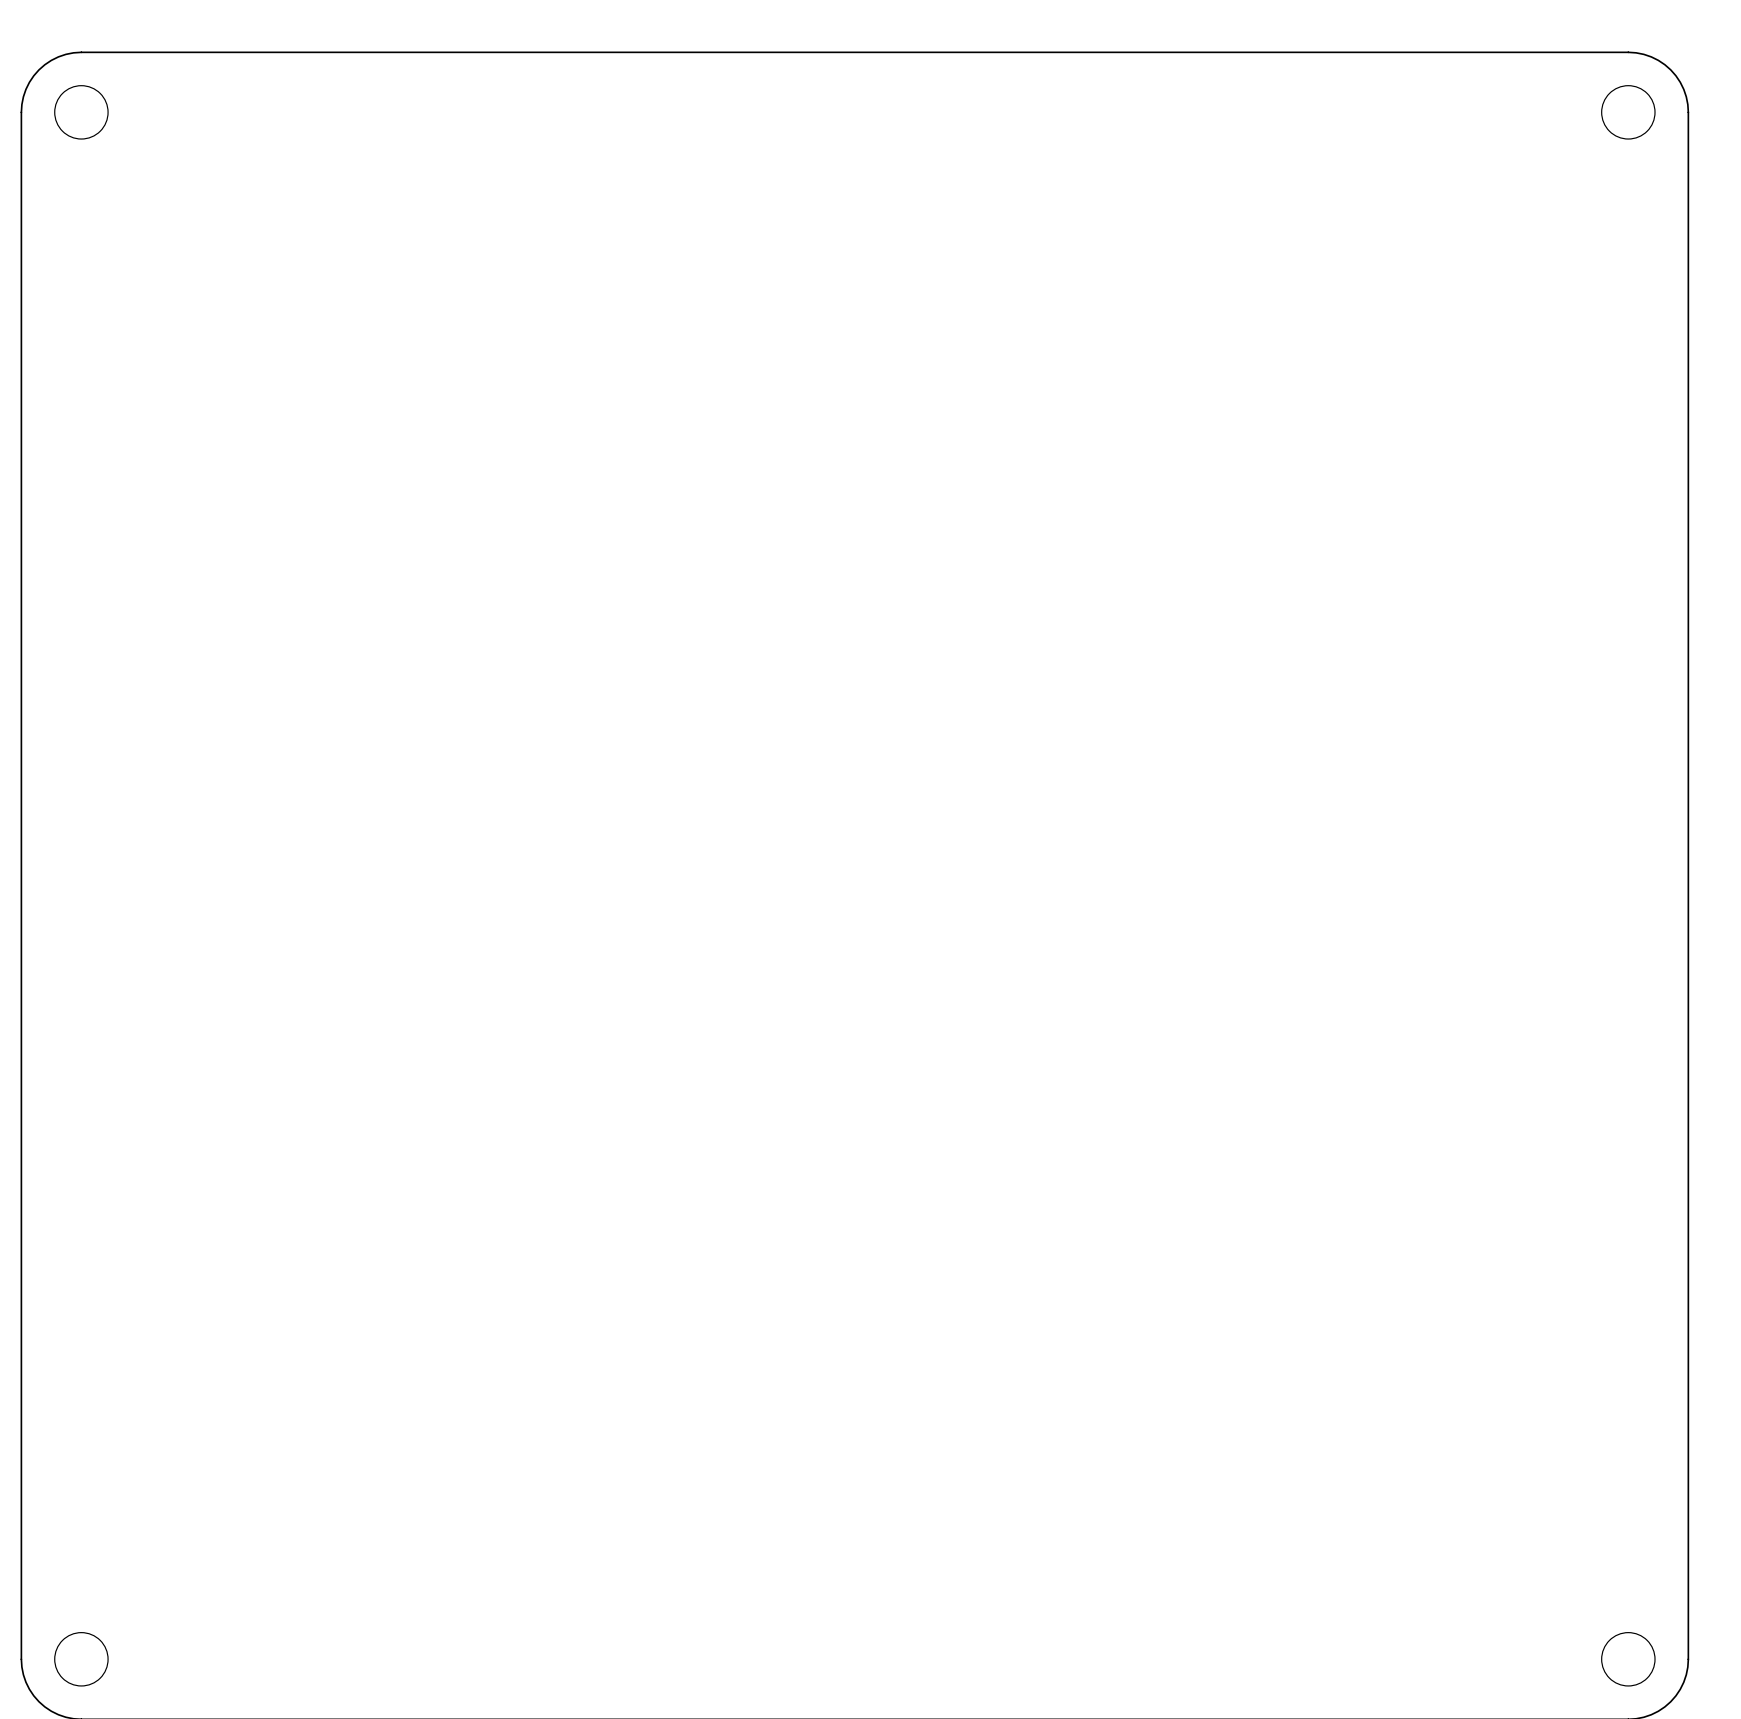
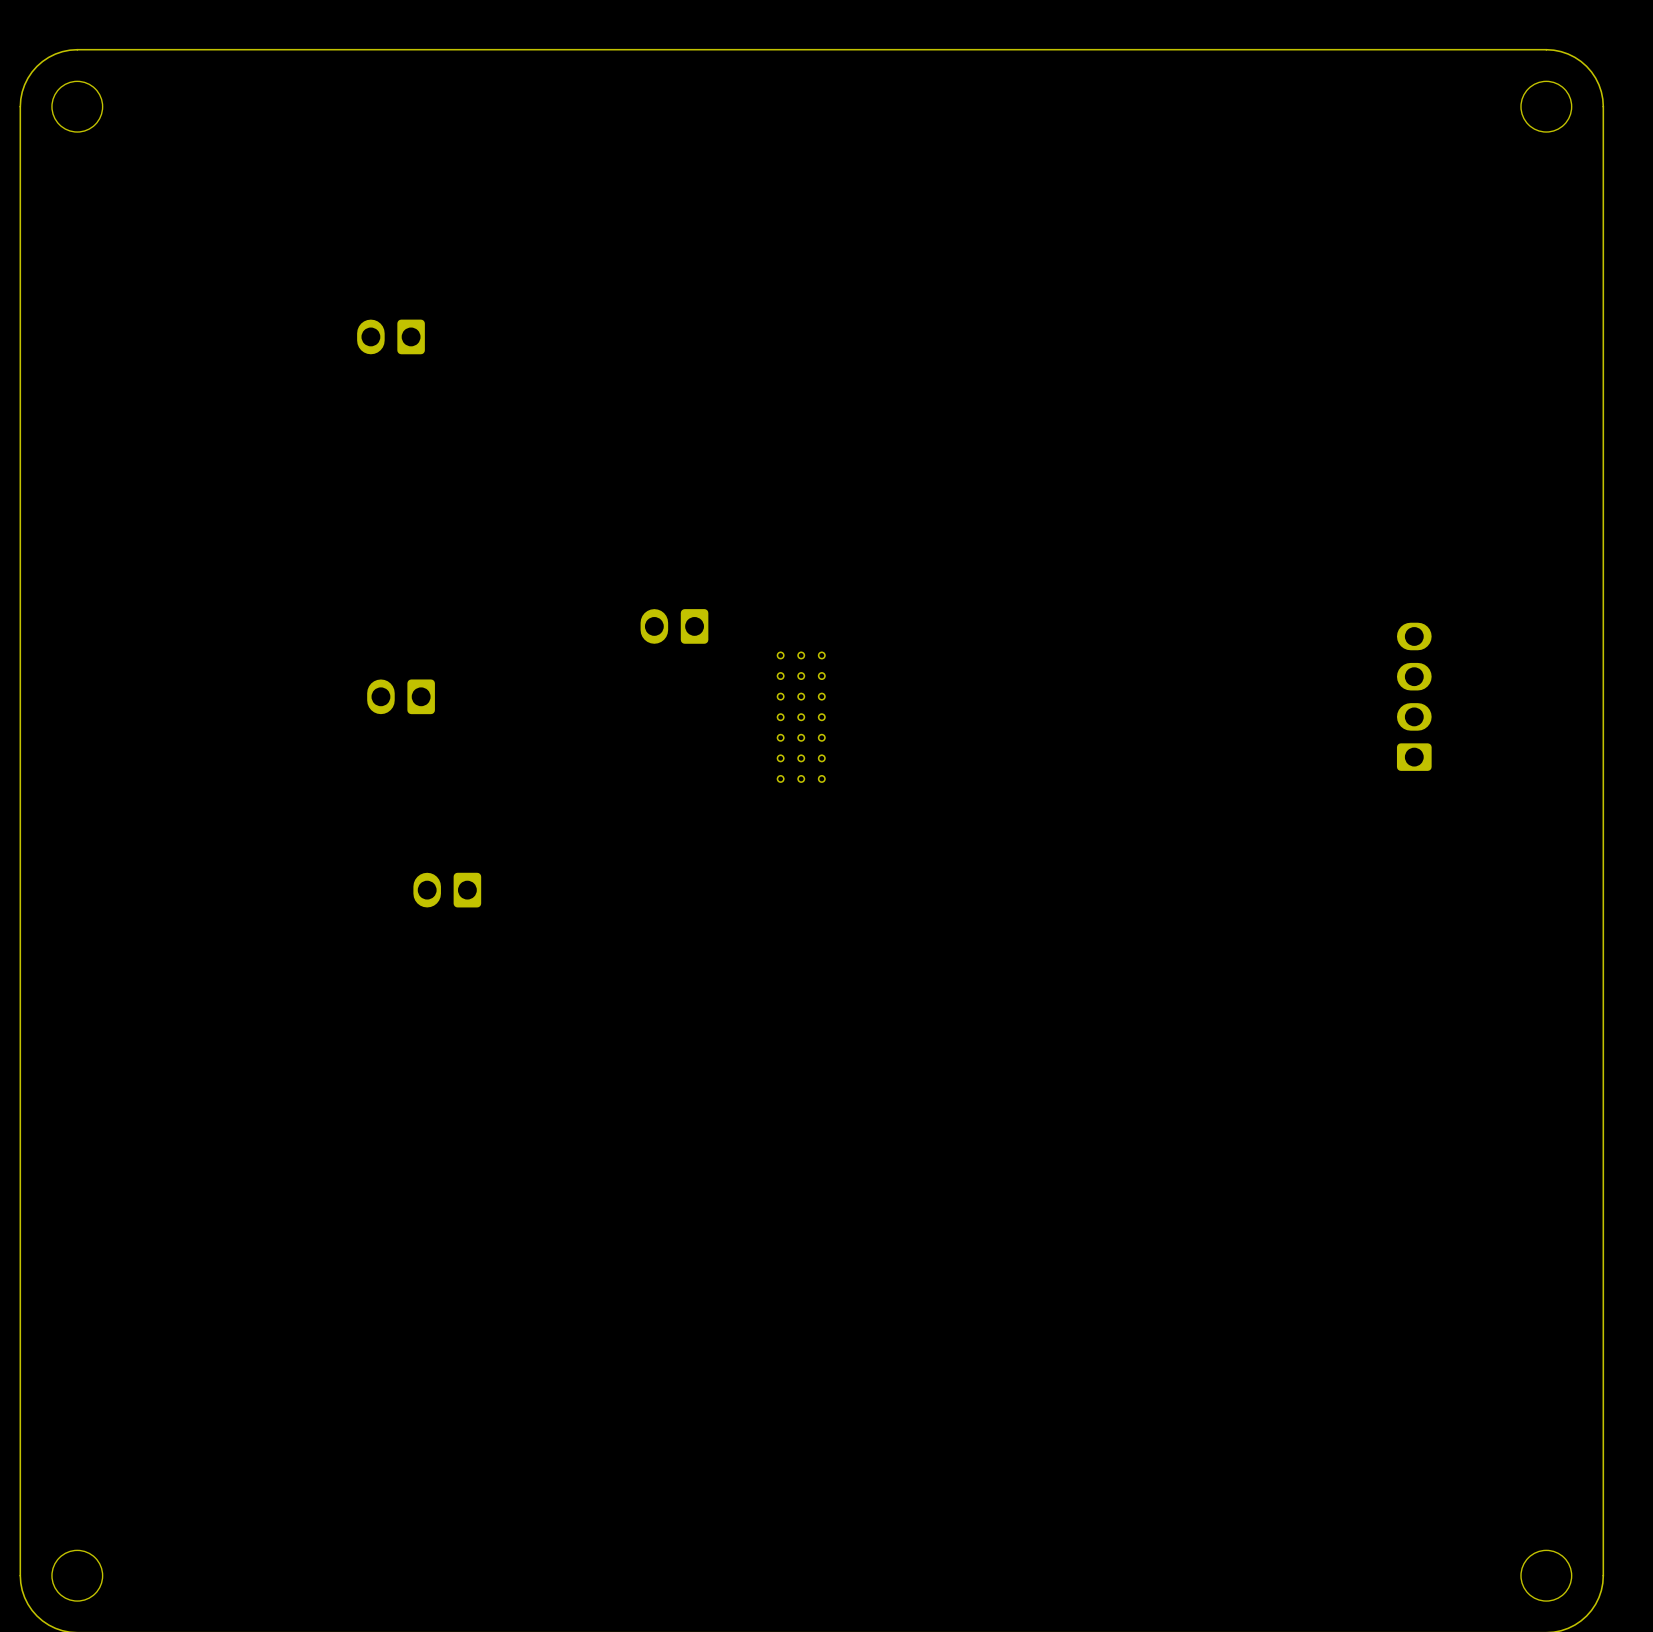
part: none -> (391, 336)
part: none -> (674, 626)
part: none -> (401, 696)
part: none -> (1414, 696)
part: none -> (801, 717)
part: none -> (447, 890)

